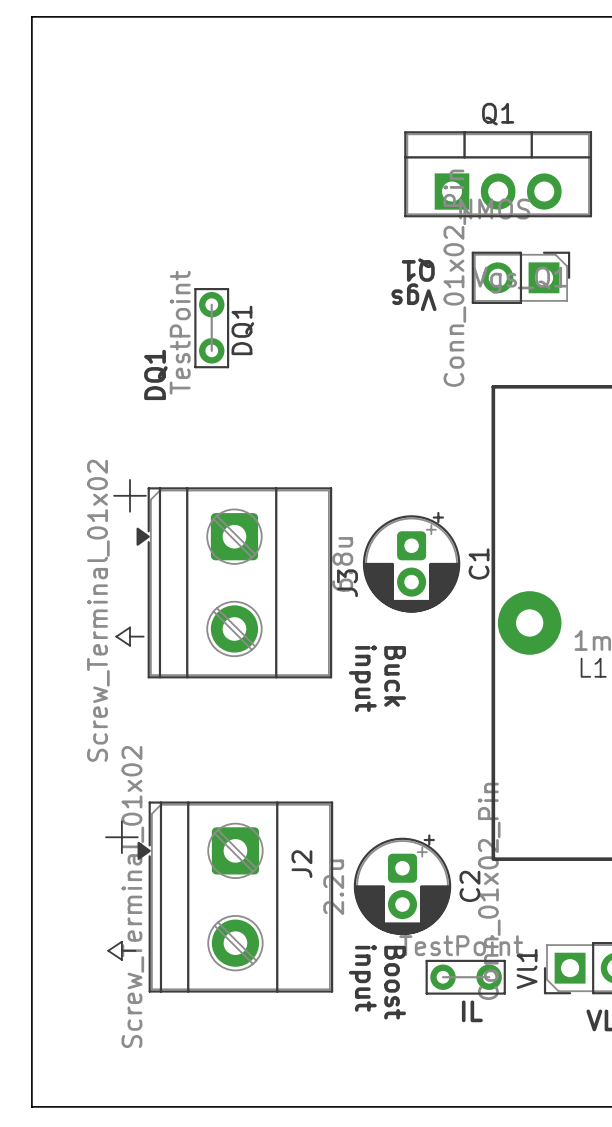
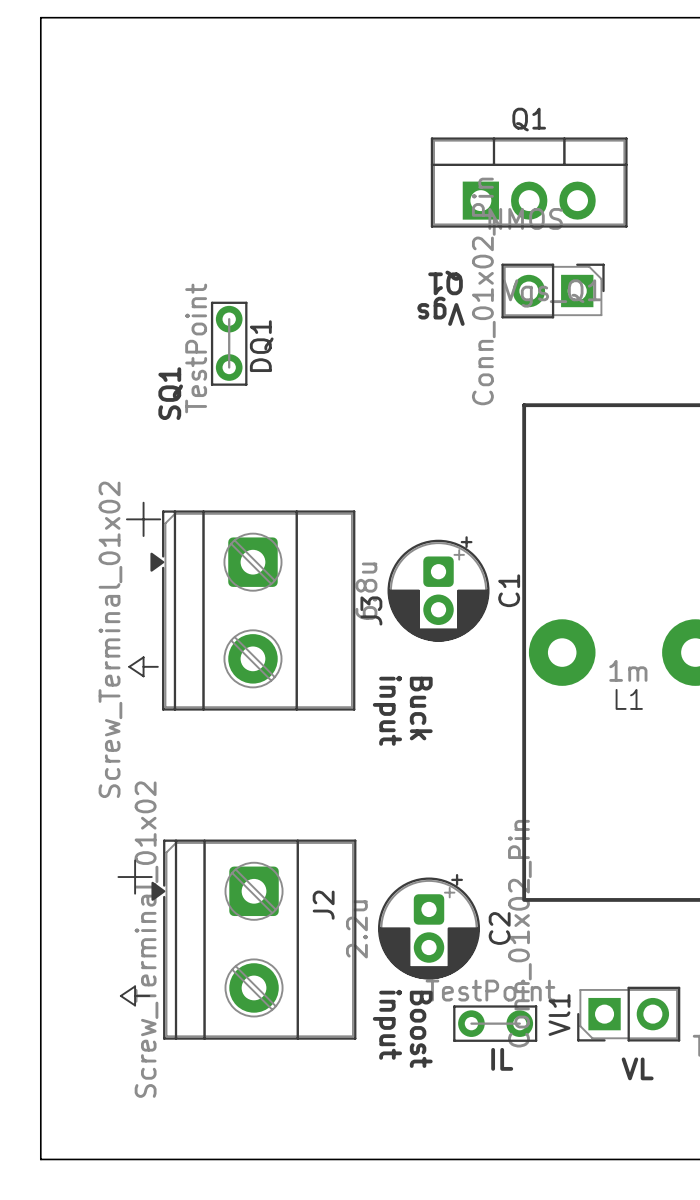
text: DQ1 (155, 374) -> SQ1 (170, 393)

